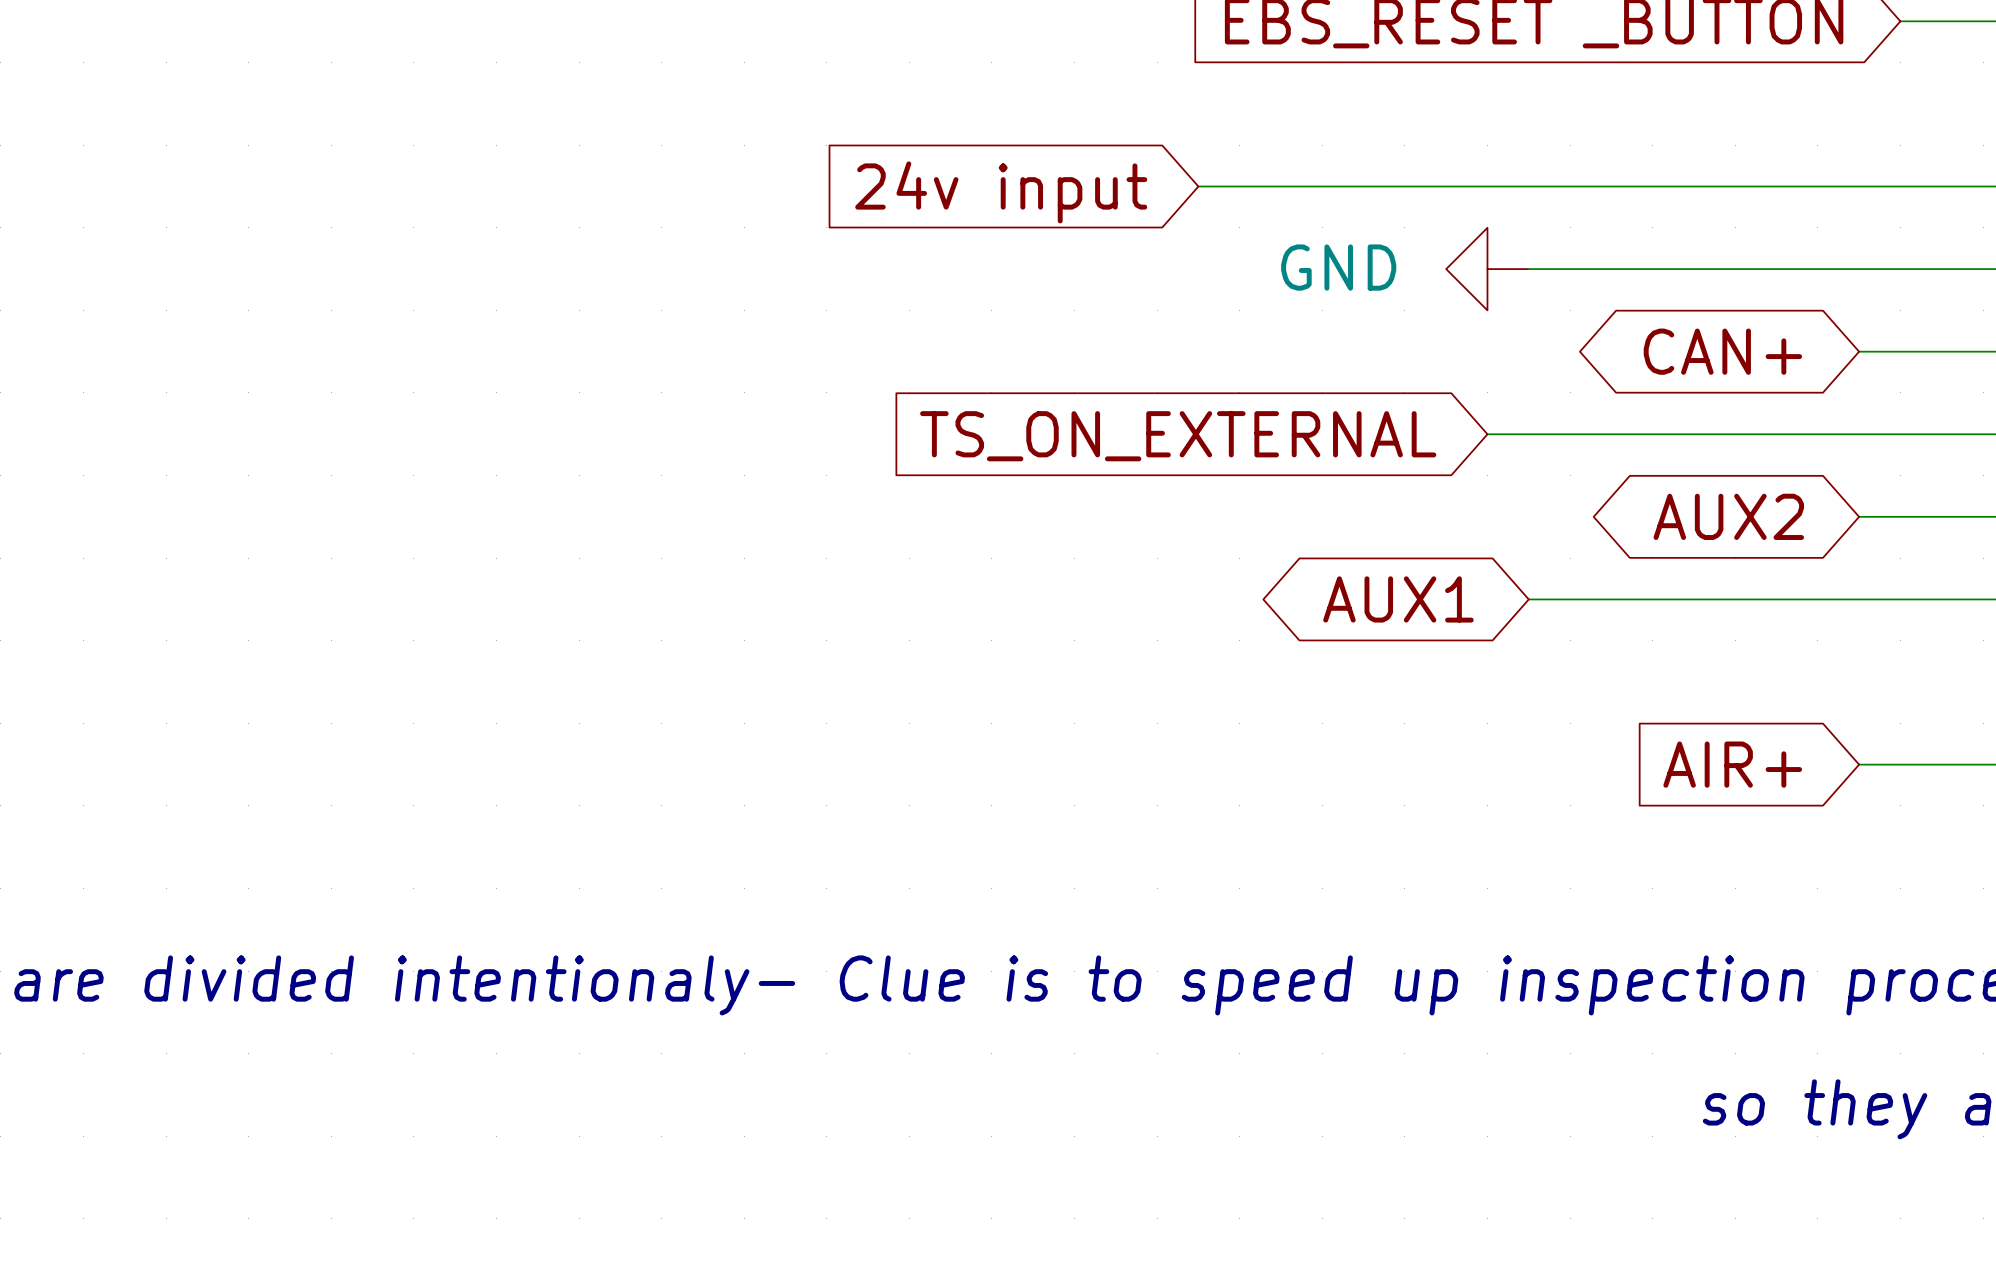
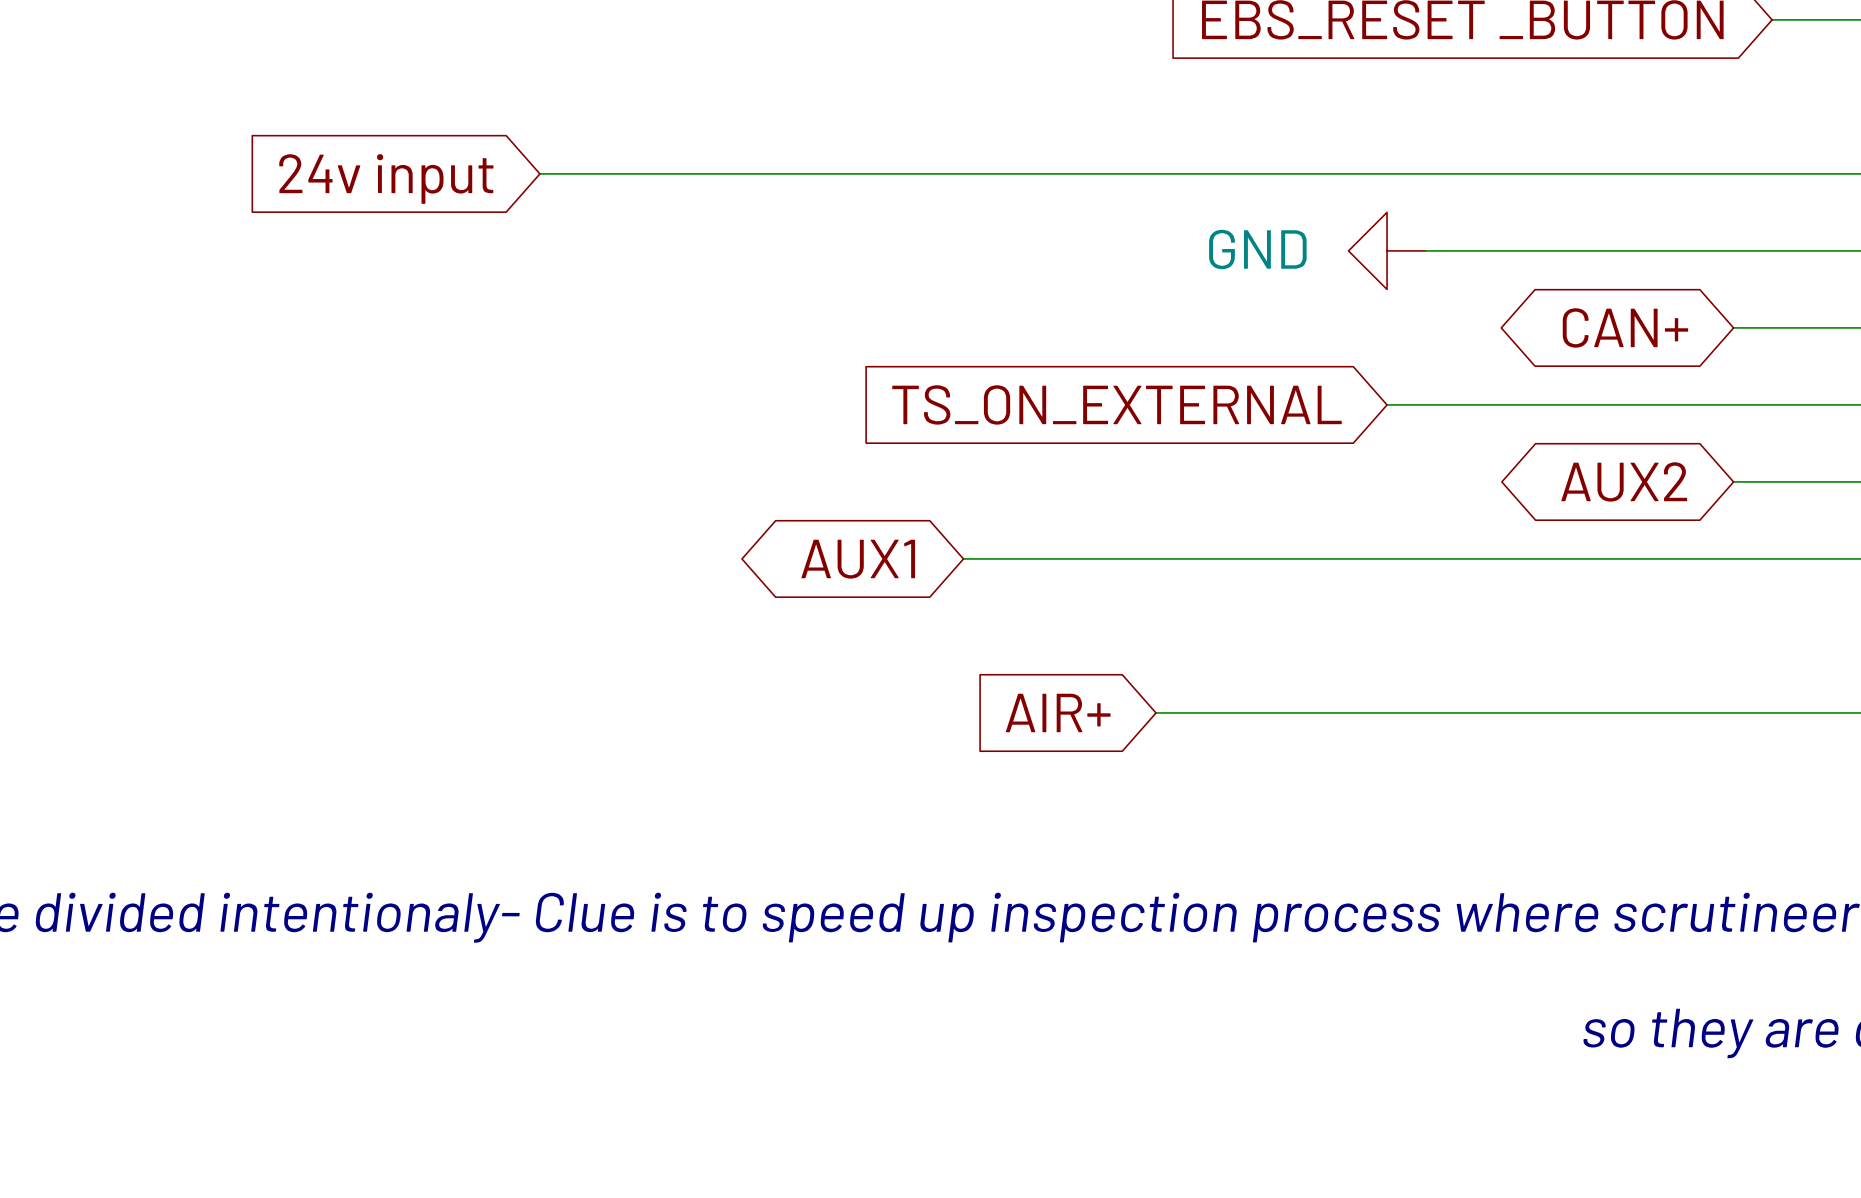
wire: none -> (539, 173) (1117, 173)
global label position: 24v input (1001, 192) -> 24v input (386, 178)
wire: none -> (963, 558) (1425, 558)
global label position: AUX1 (1398, 599) -> AUX1 (858, 559)
wire: none -> (1156, 712) (1733, 712)
global label position: AIR+ (1732, 764) -> AIR+ (1058, 712)

